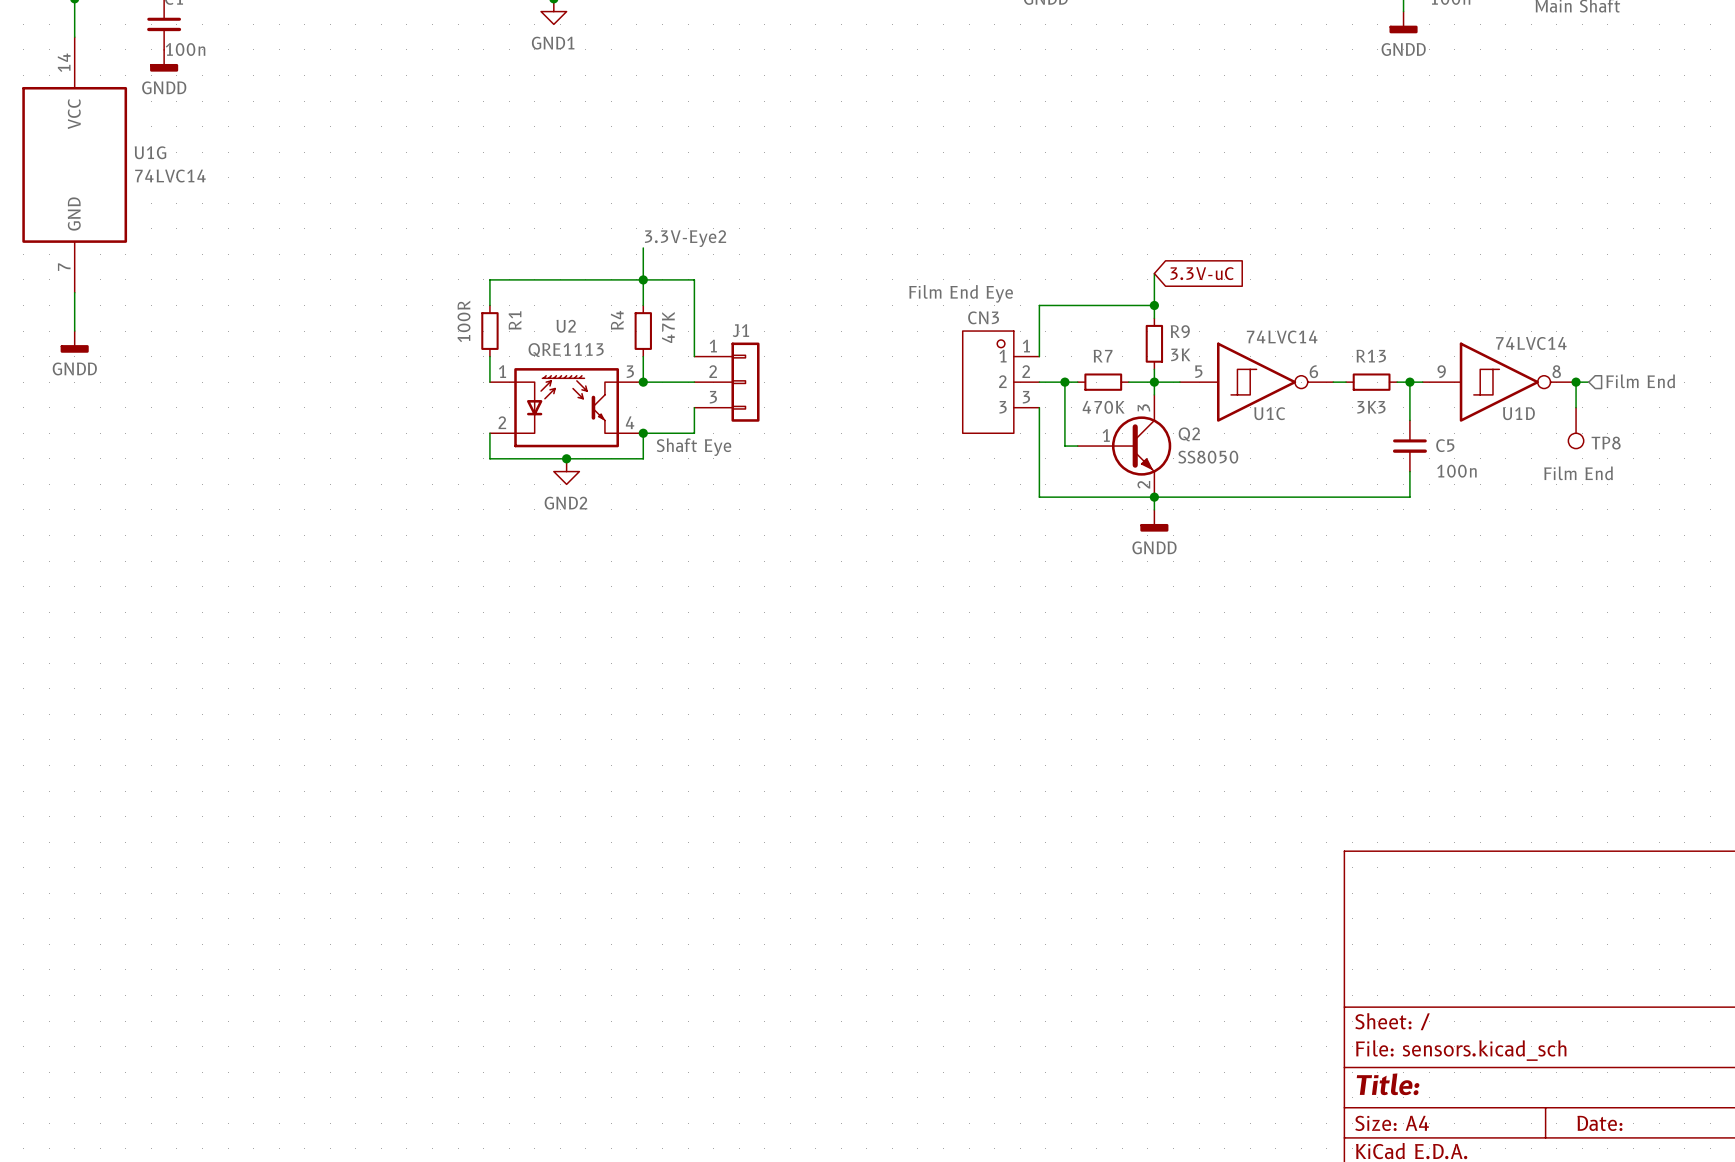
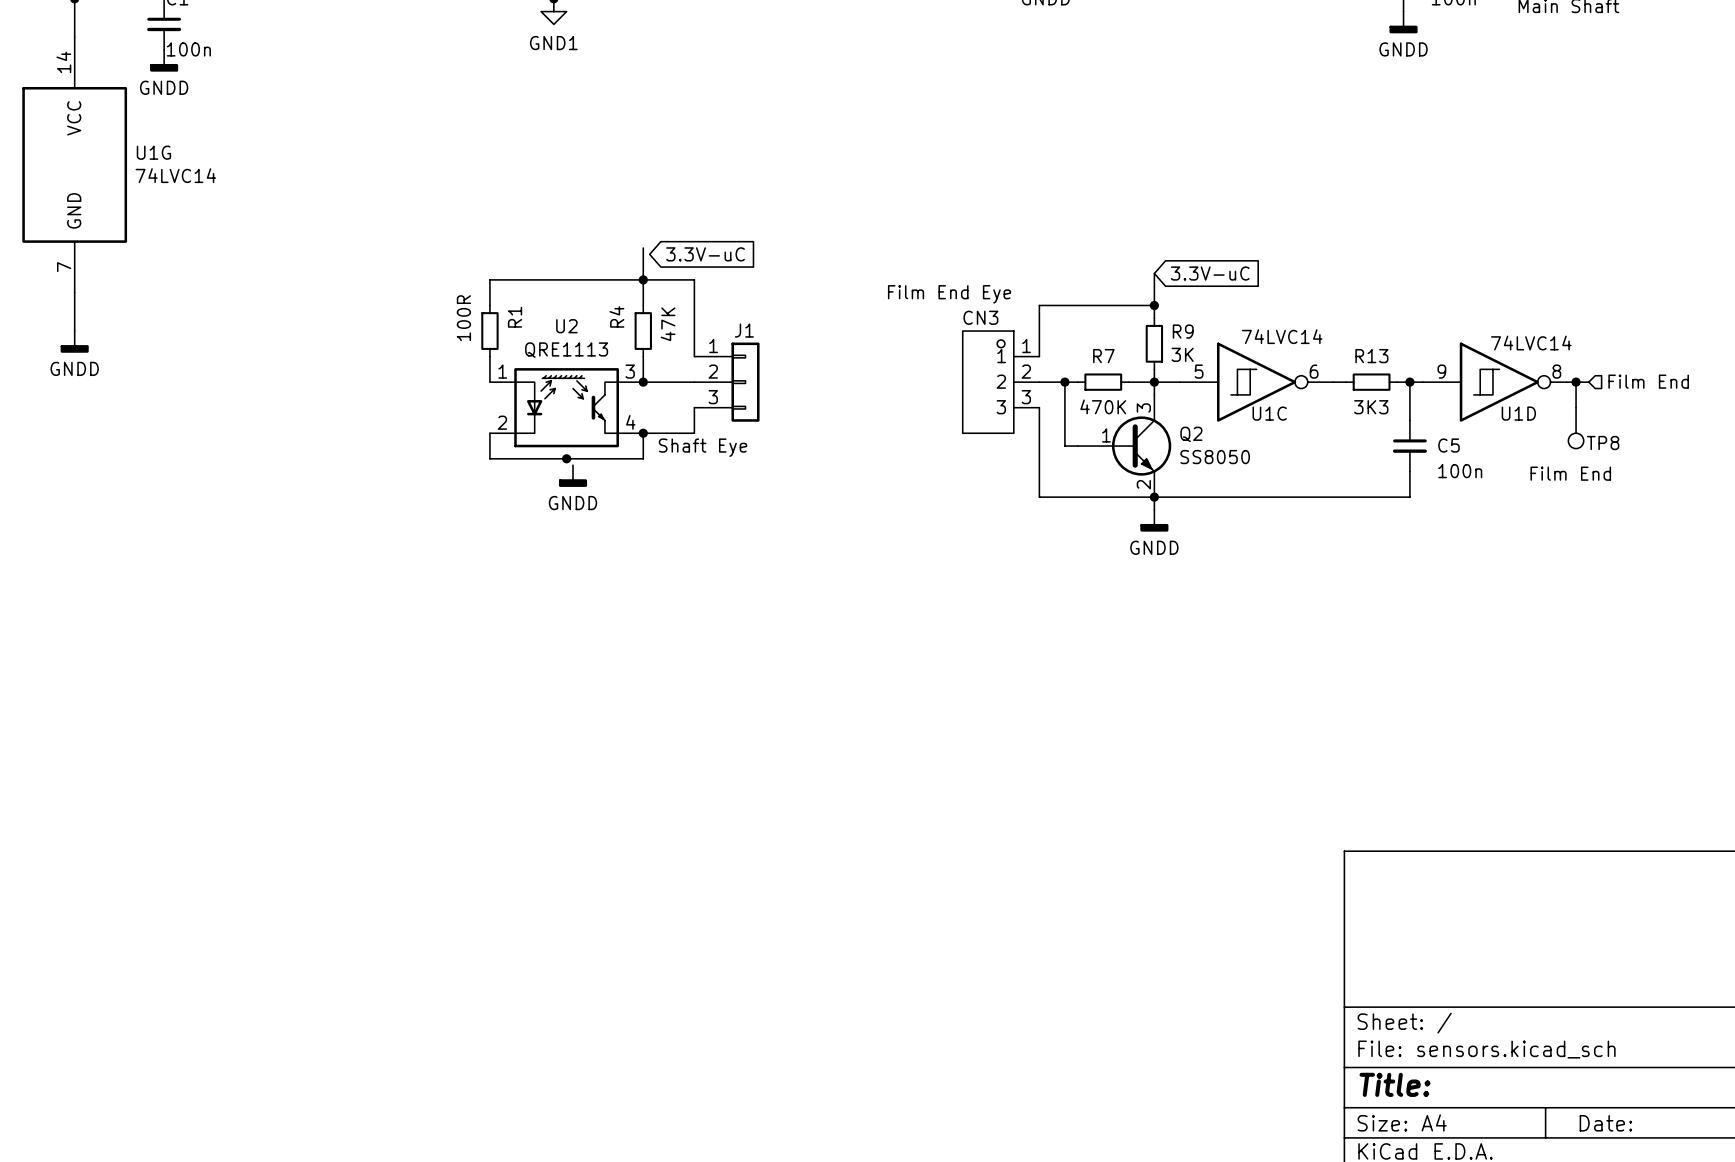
label: 3.3V-Eye2 (685, 238) -> none
global label: none -> 3.3V-uC (705, 254)
power symbol: GND2 (566, 471) -> GNDD (573, 476)

